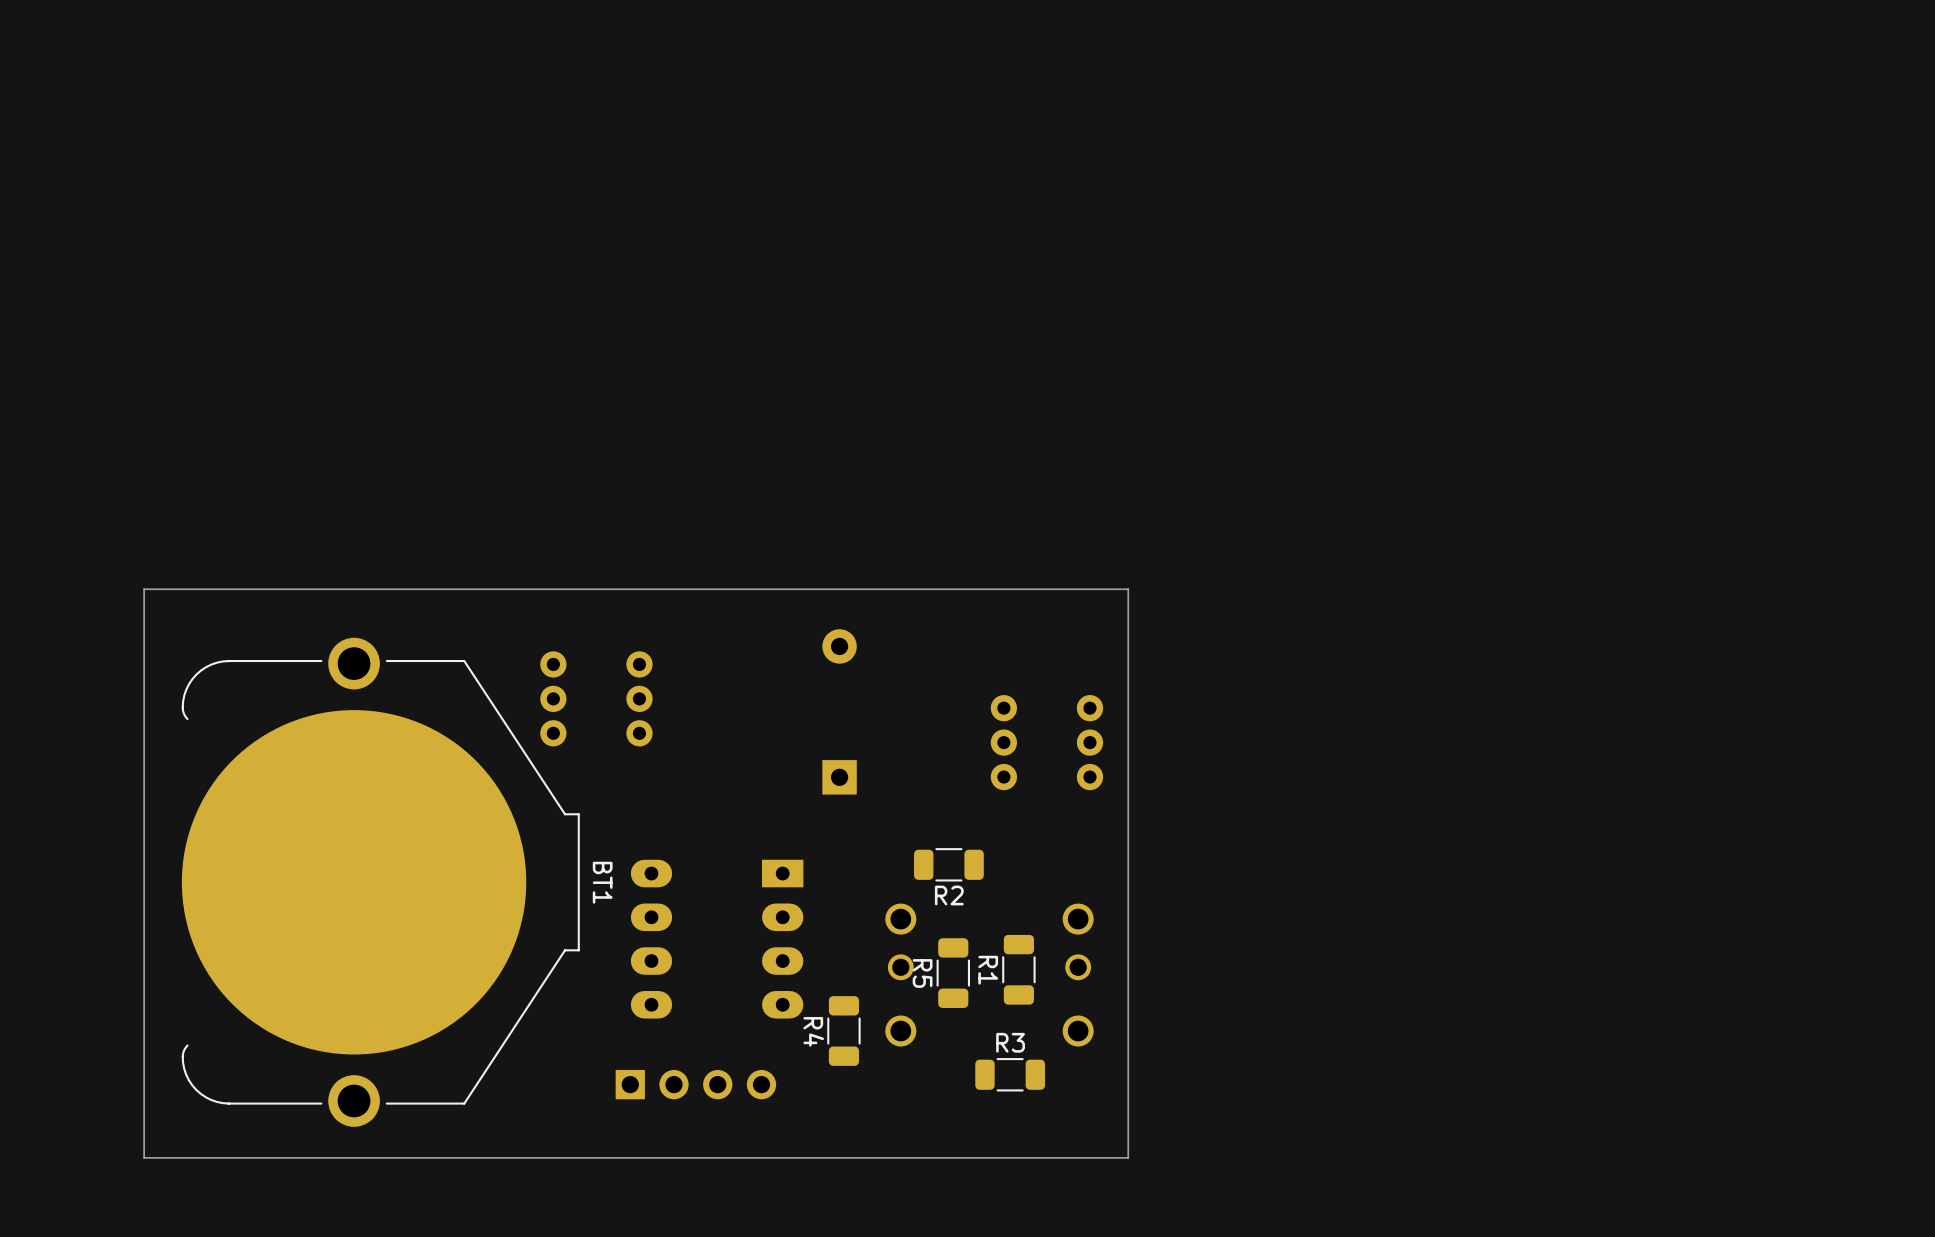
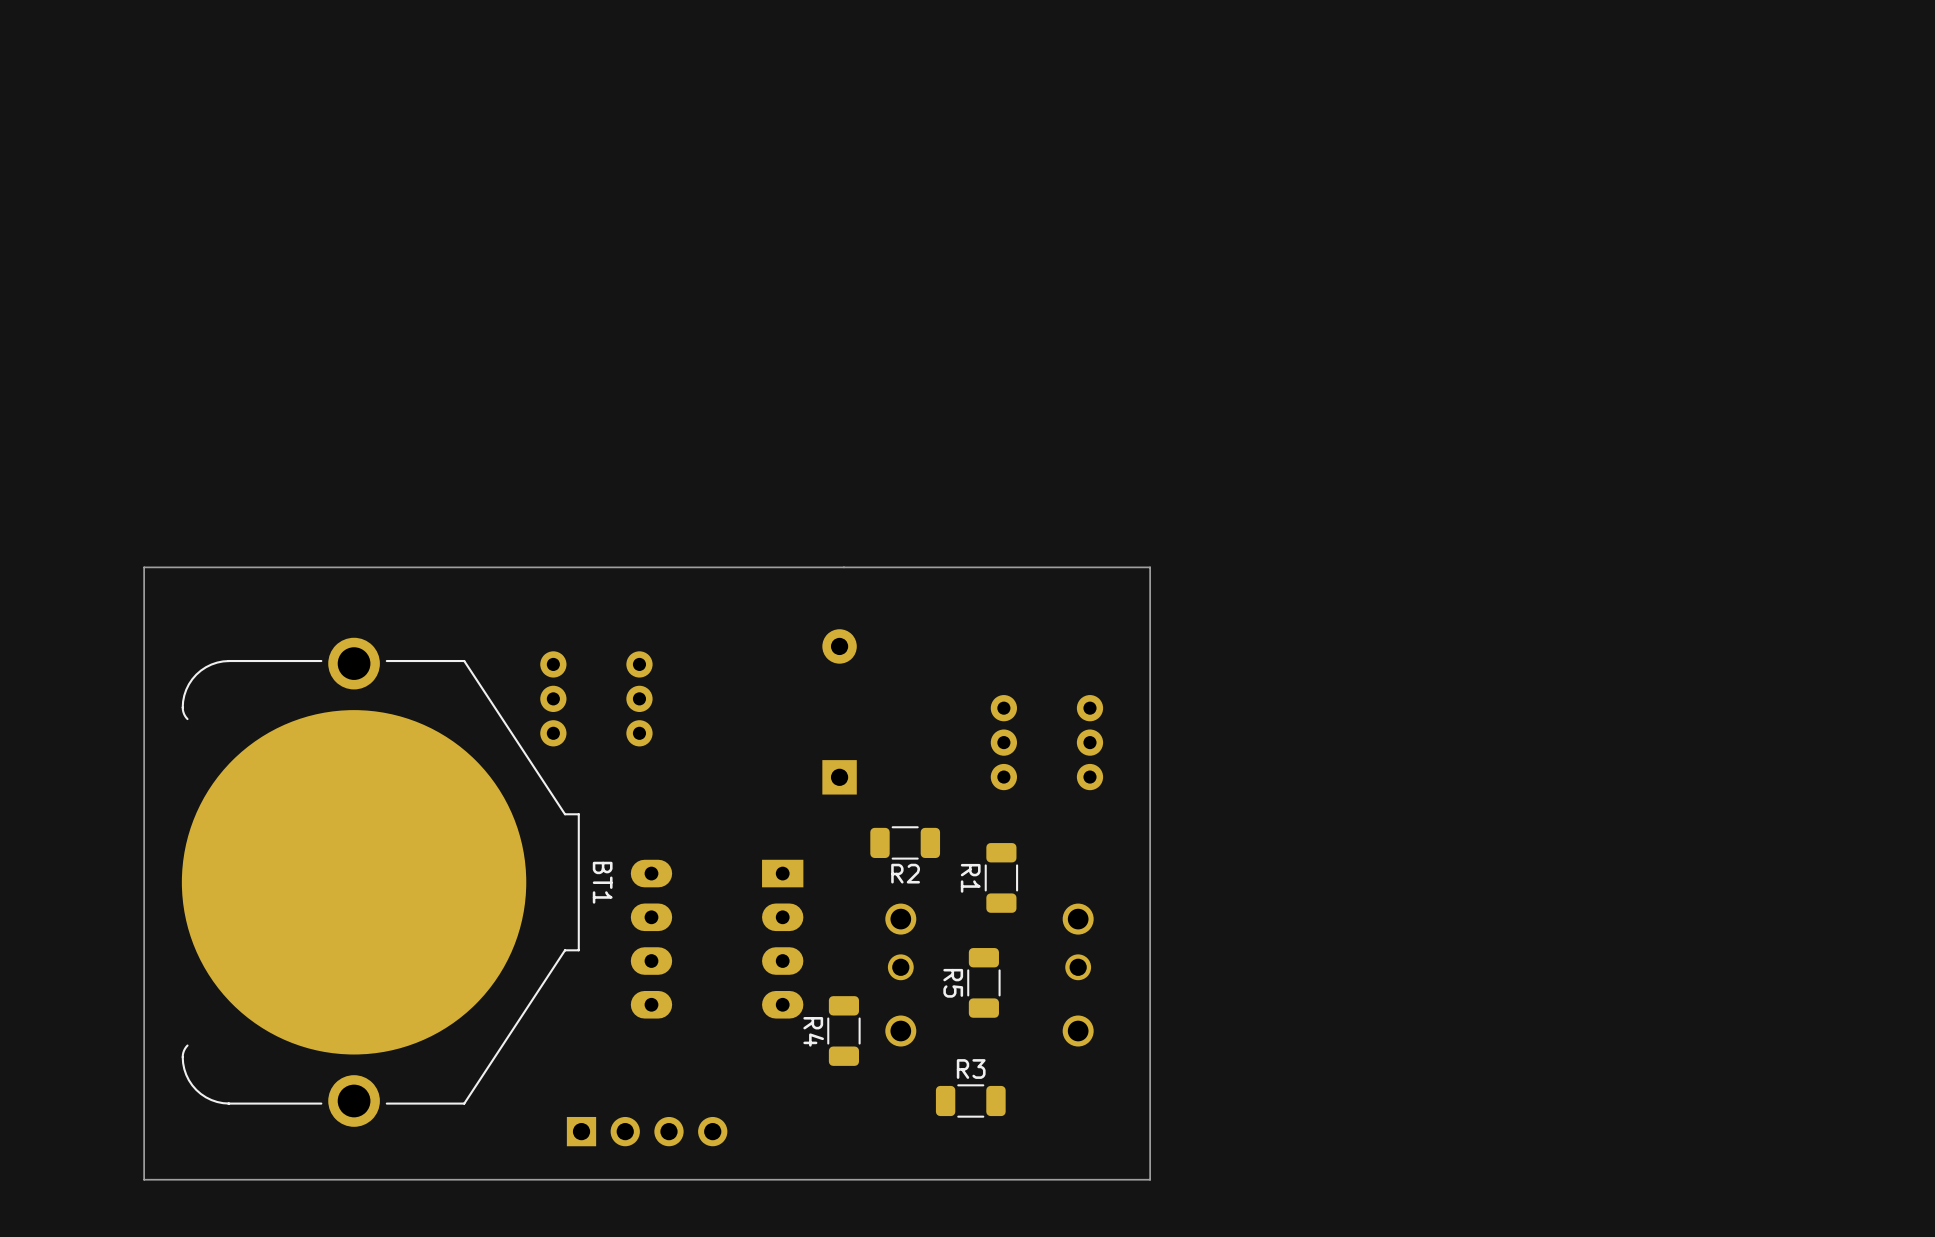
board edge: (144, 589) (1128, 589) (1128, 1157) (144, 1157) -> (144, 589) (144, 567) (1150, 567) (1150, 1179) (144, 1179) (144, 1157)
R2 position: (948, 864) -> (905, 842)
R1 position: (1018, 969) -> (1001, 877)
R5 position: (953, 973) -> (983, 982)
R3 position: (1010, 1074) -> (970, 1100)
part position: (695, 1084) -> (647, 1131)

